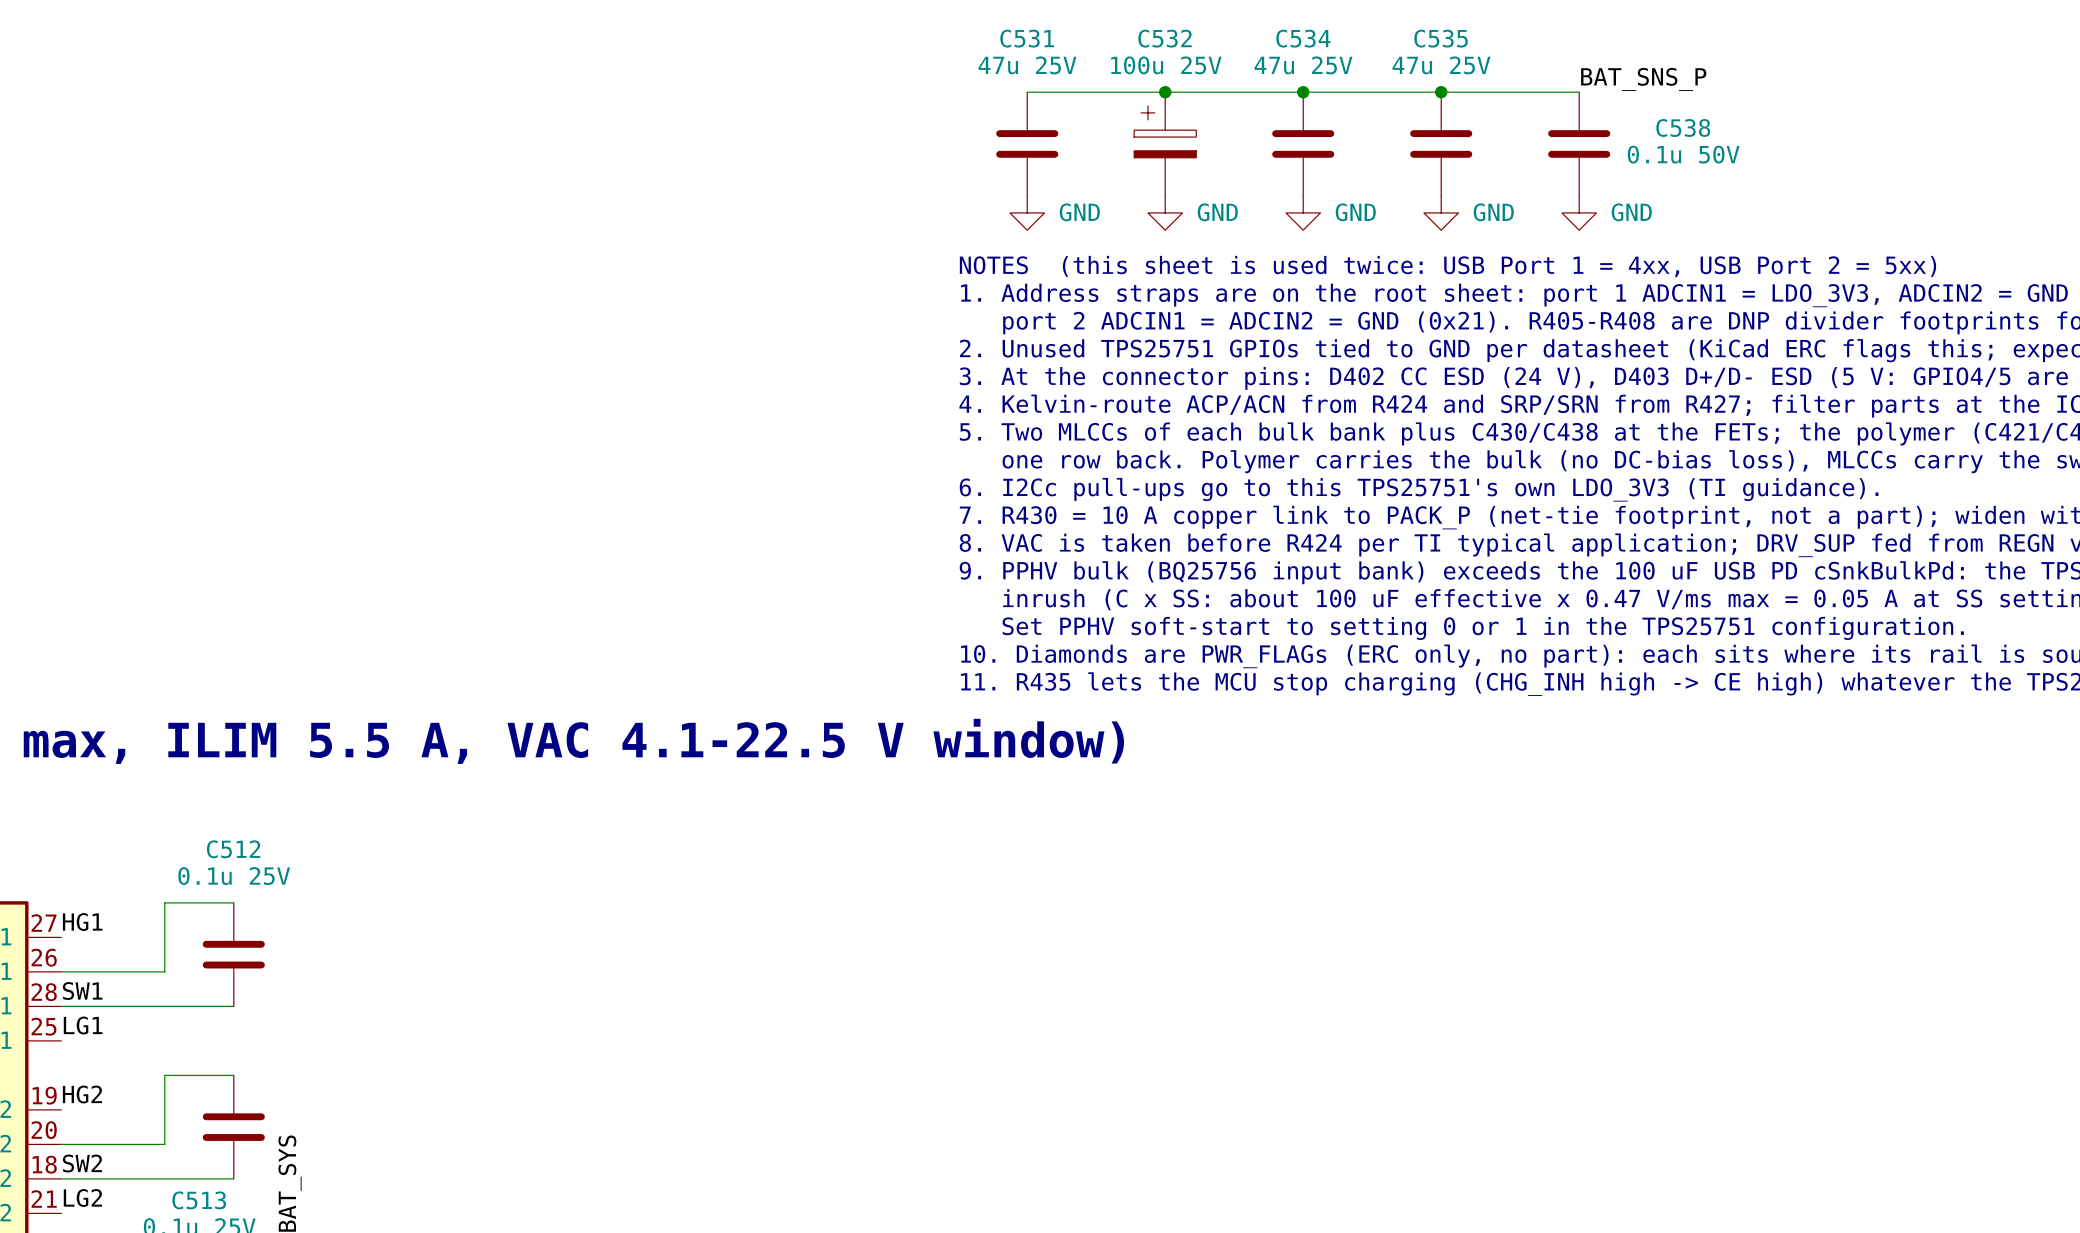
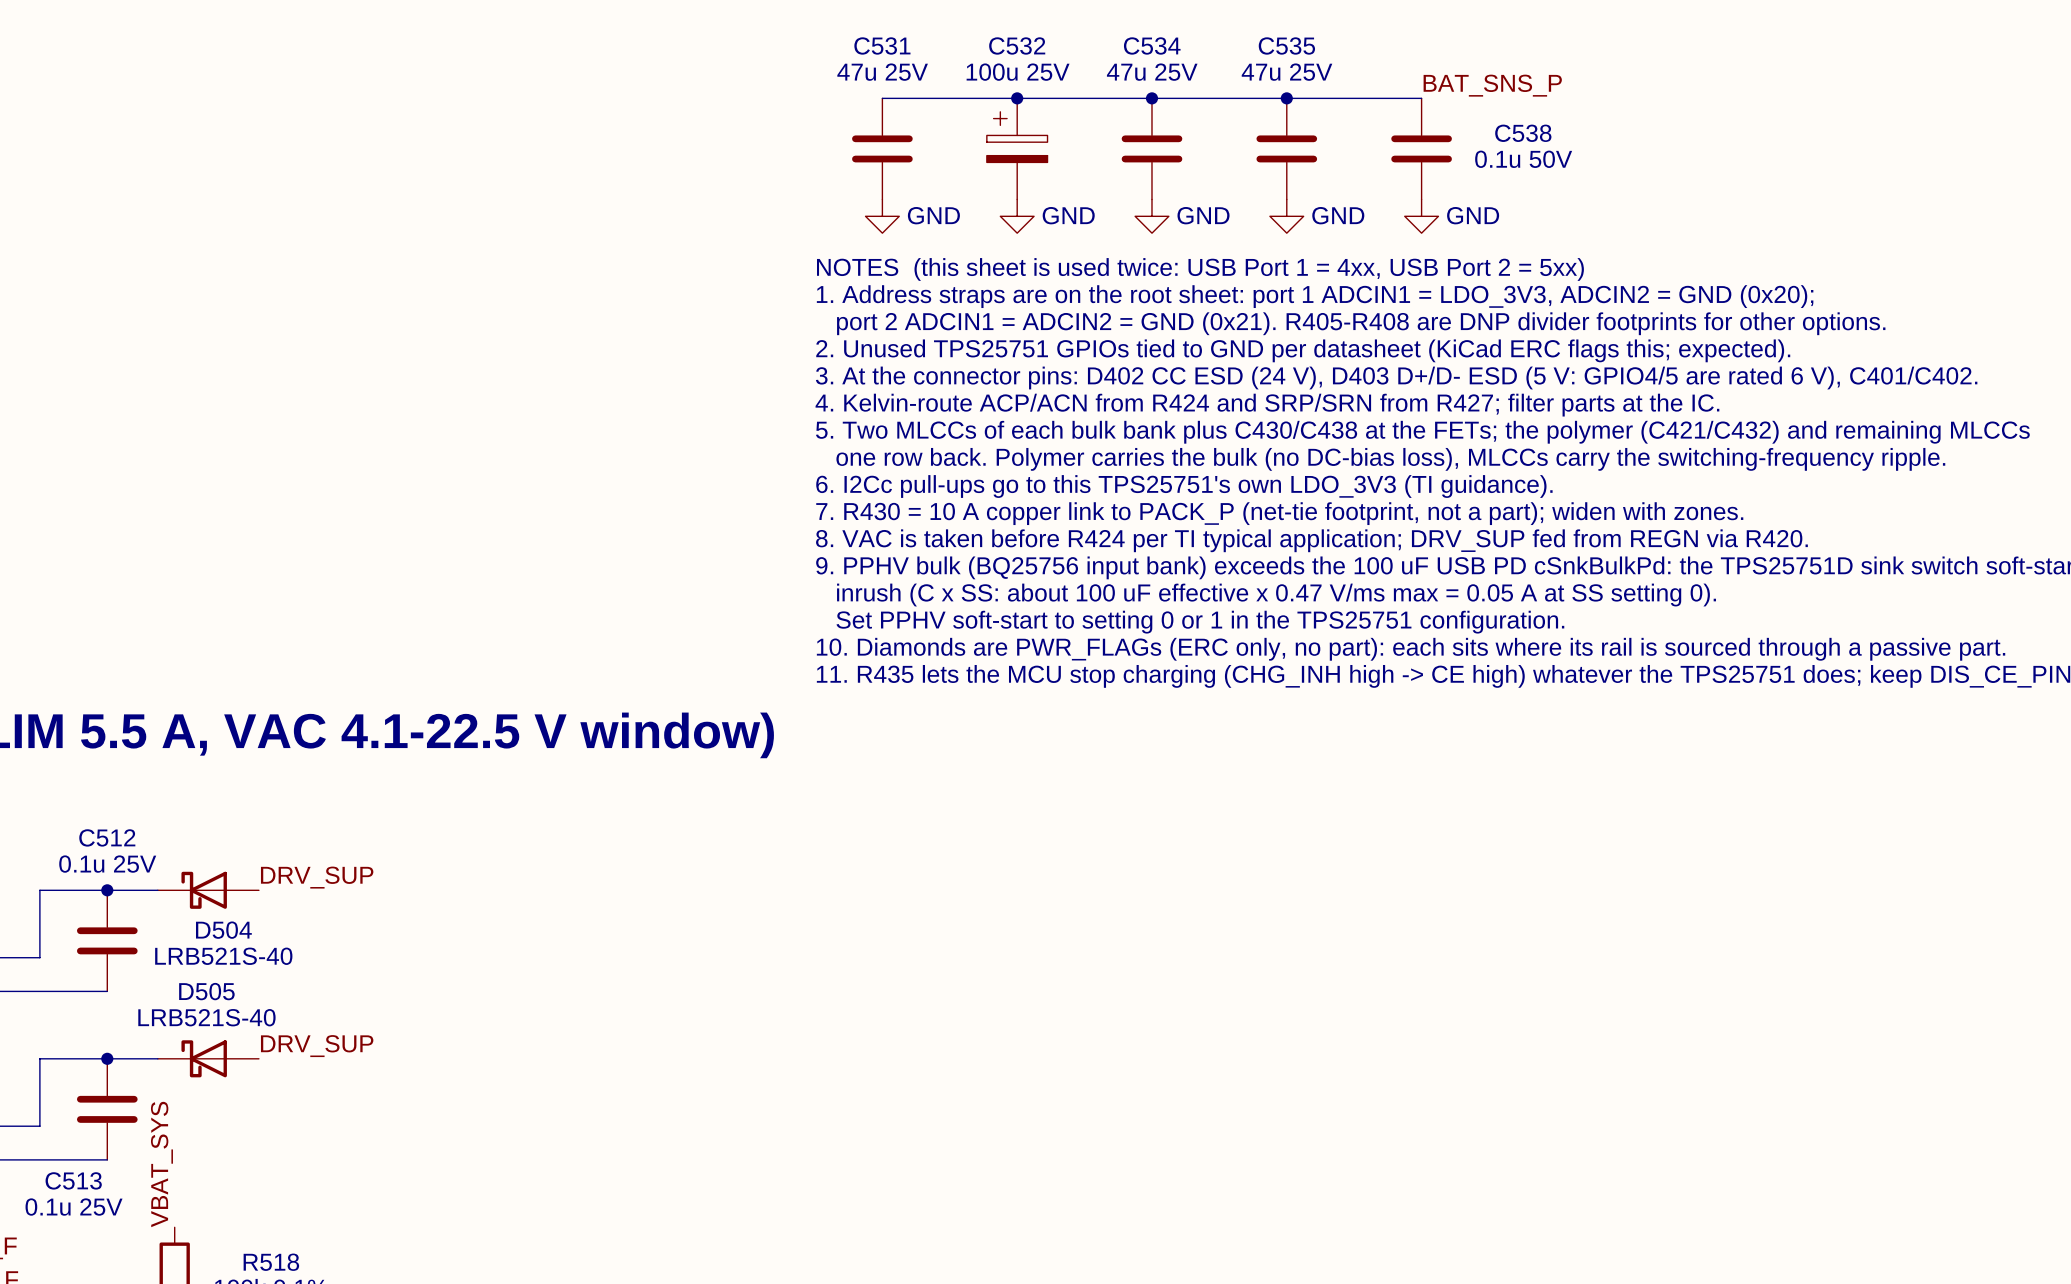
label: none -> DRV_SUP (317, 877)
wire: none -> (107, 890) (157, 890)
junction: none -> (107, 890)
D504: none -> LRB521S-40 (208, 890)
label: none -> DRV_SUP (317, 1046)
wire: none -> (107, 1058) (157, 1058)
junction: none -> (107, 1058)
D505: none -> LRB521S-40 (208, 1058)

